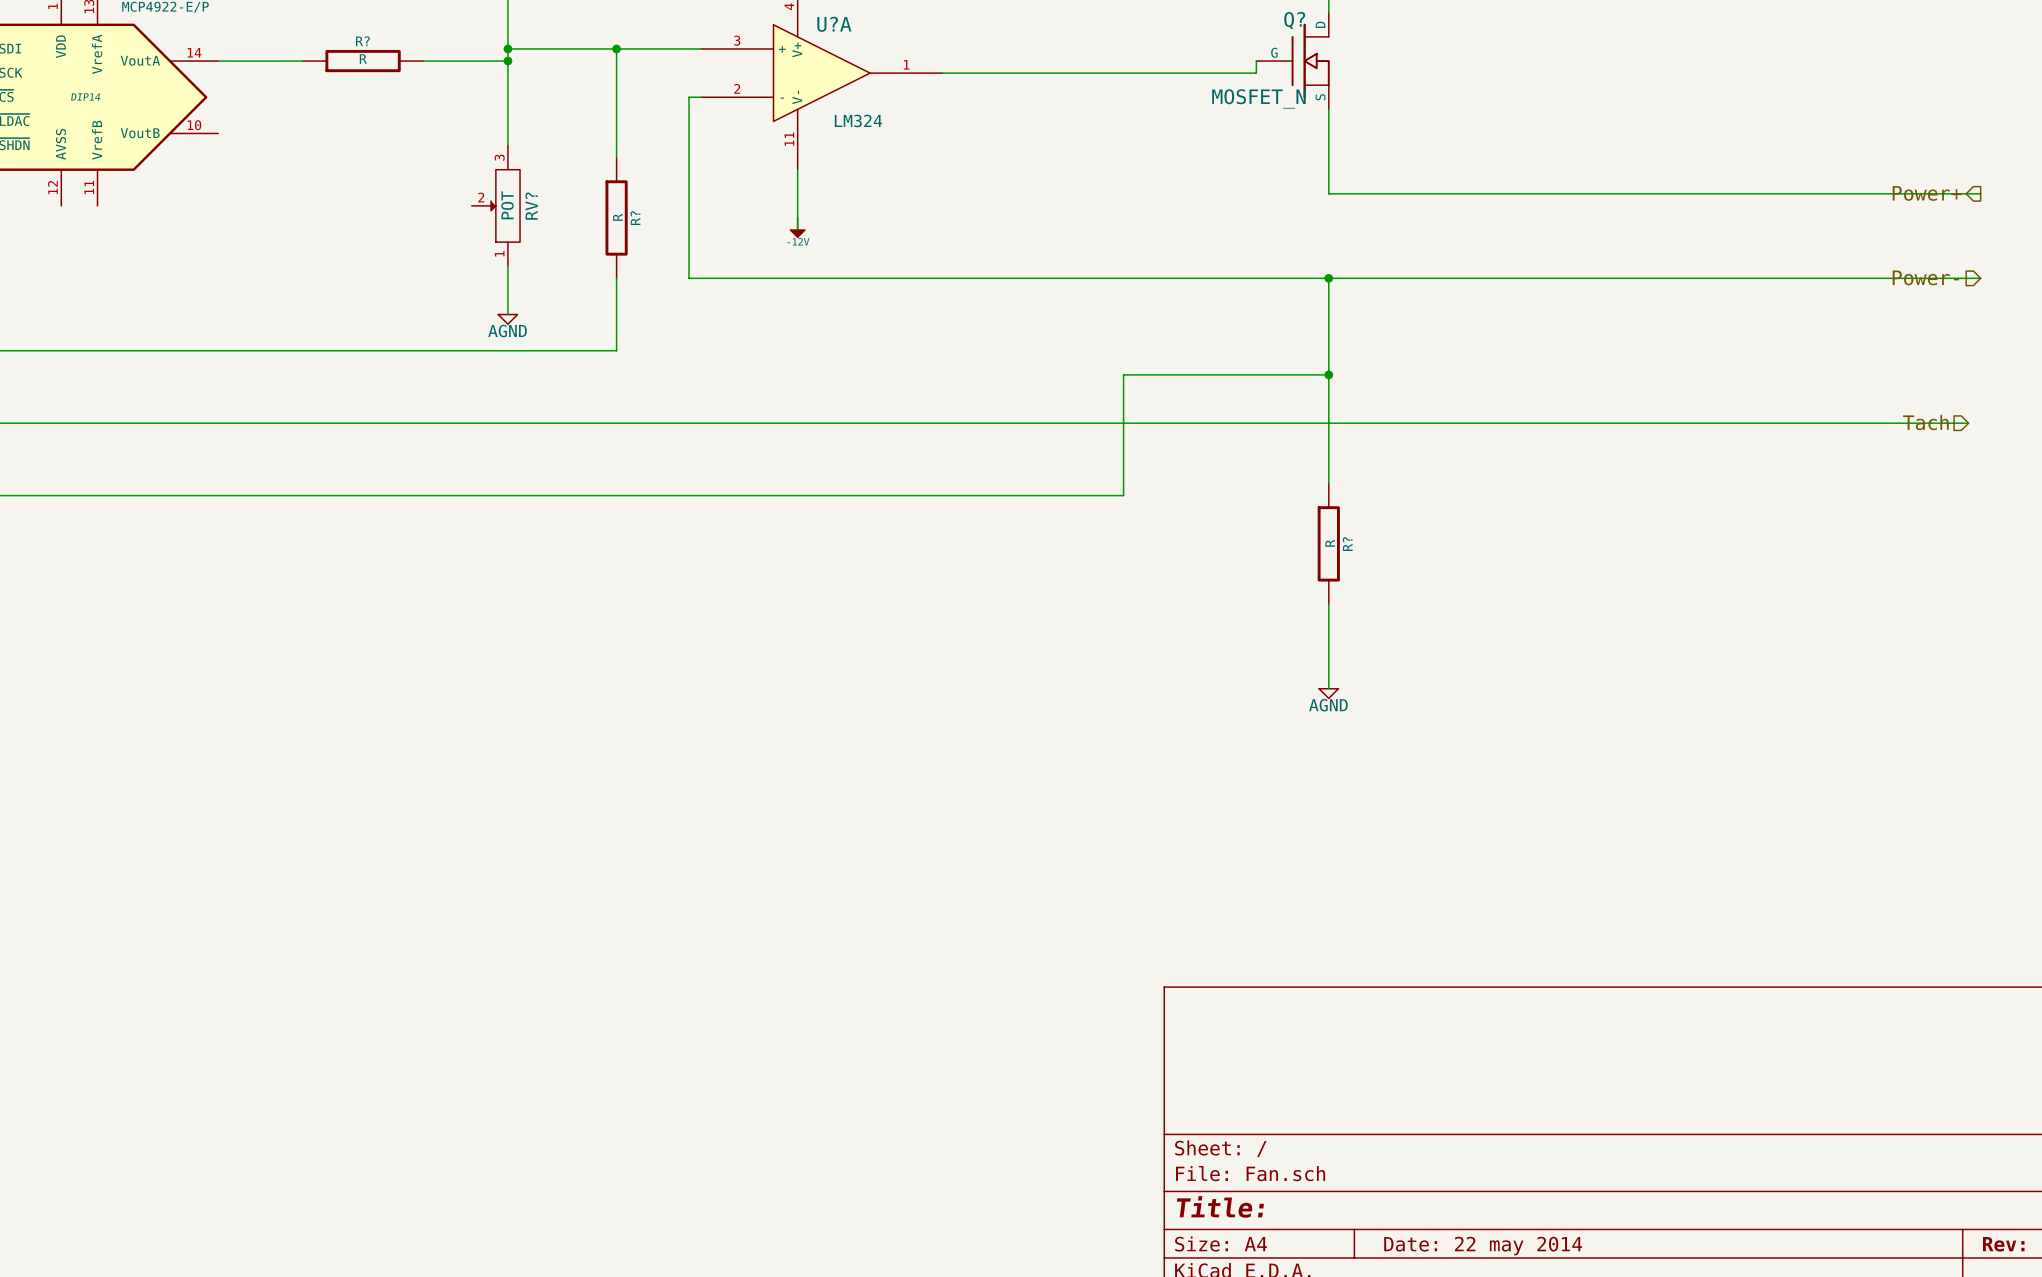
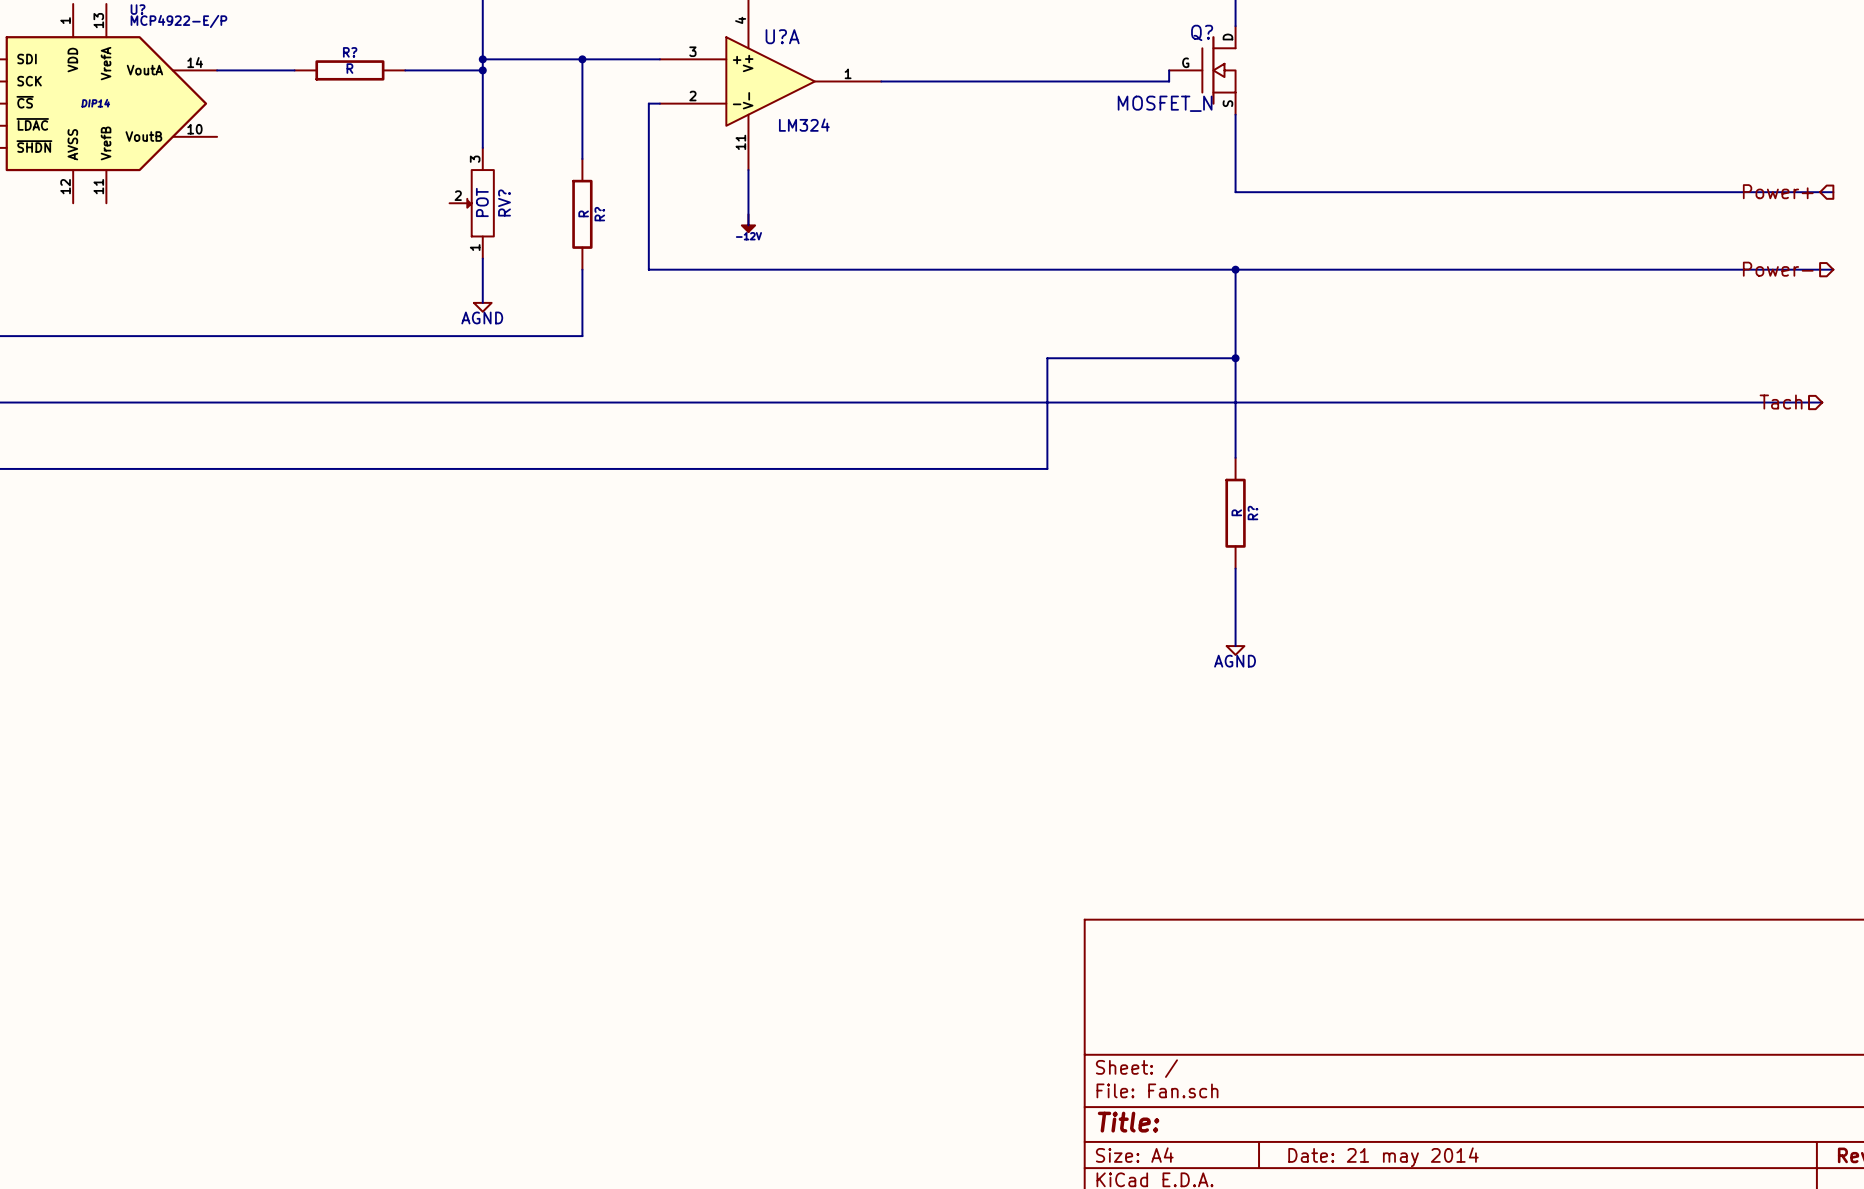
title block: Date: 22 may 2014 (1483, 1246) -> Date: 21 may 2014 (1383, 1157)

